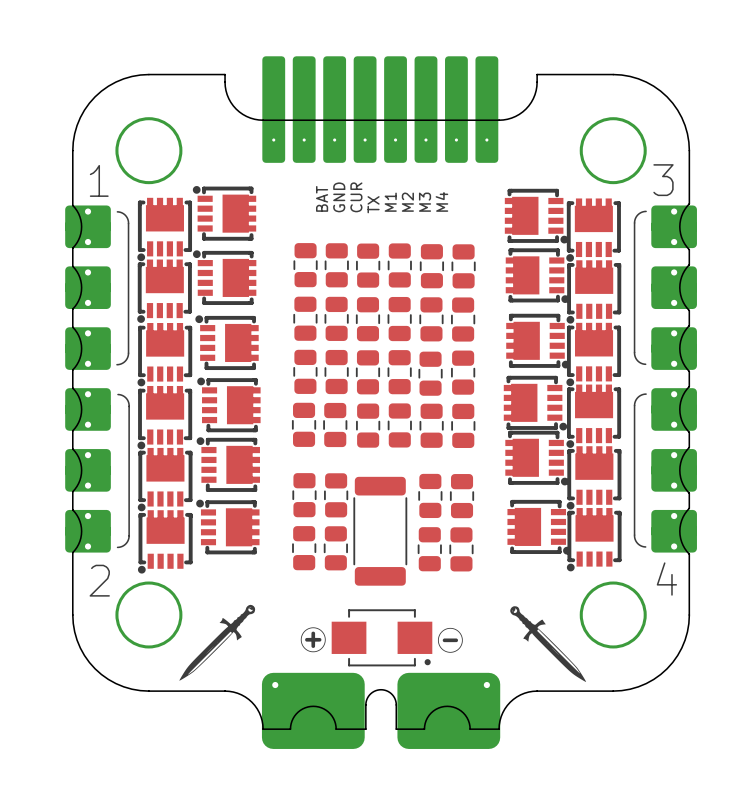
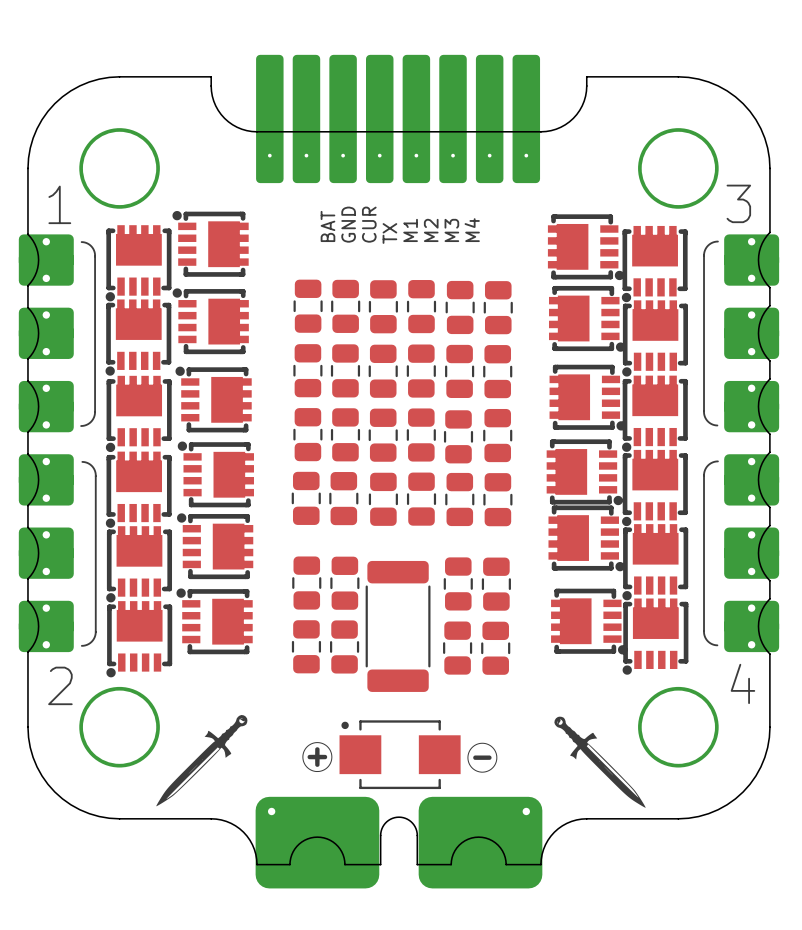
part rotation: 0° (381, 637) -> 180° (400, 754)

